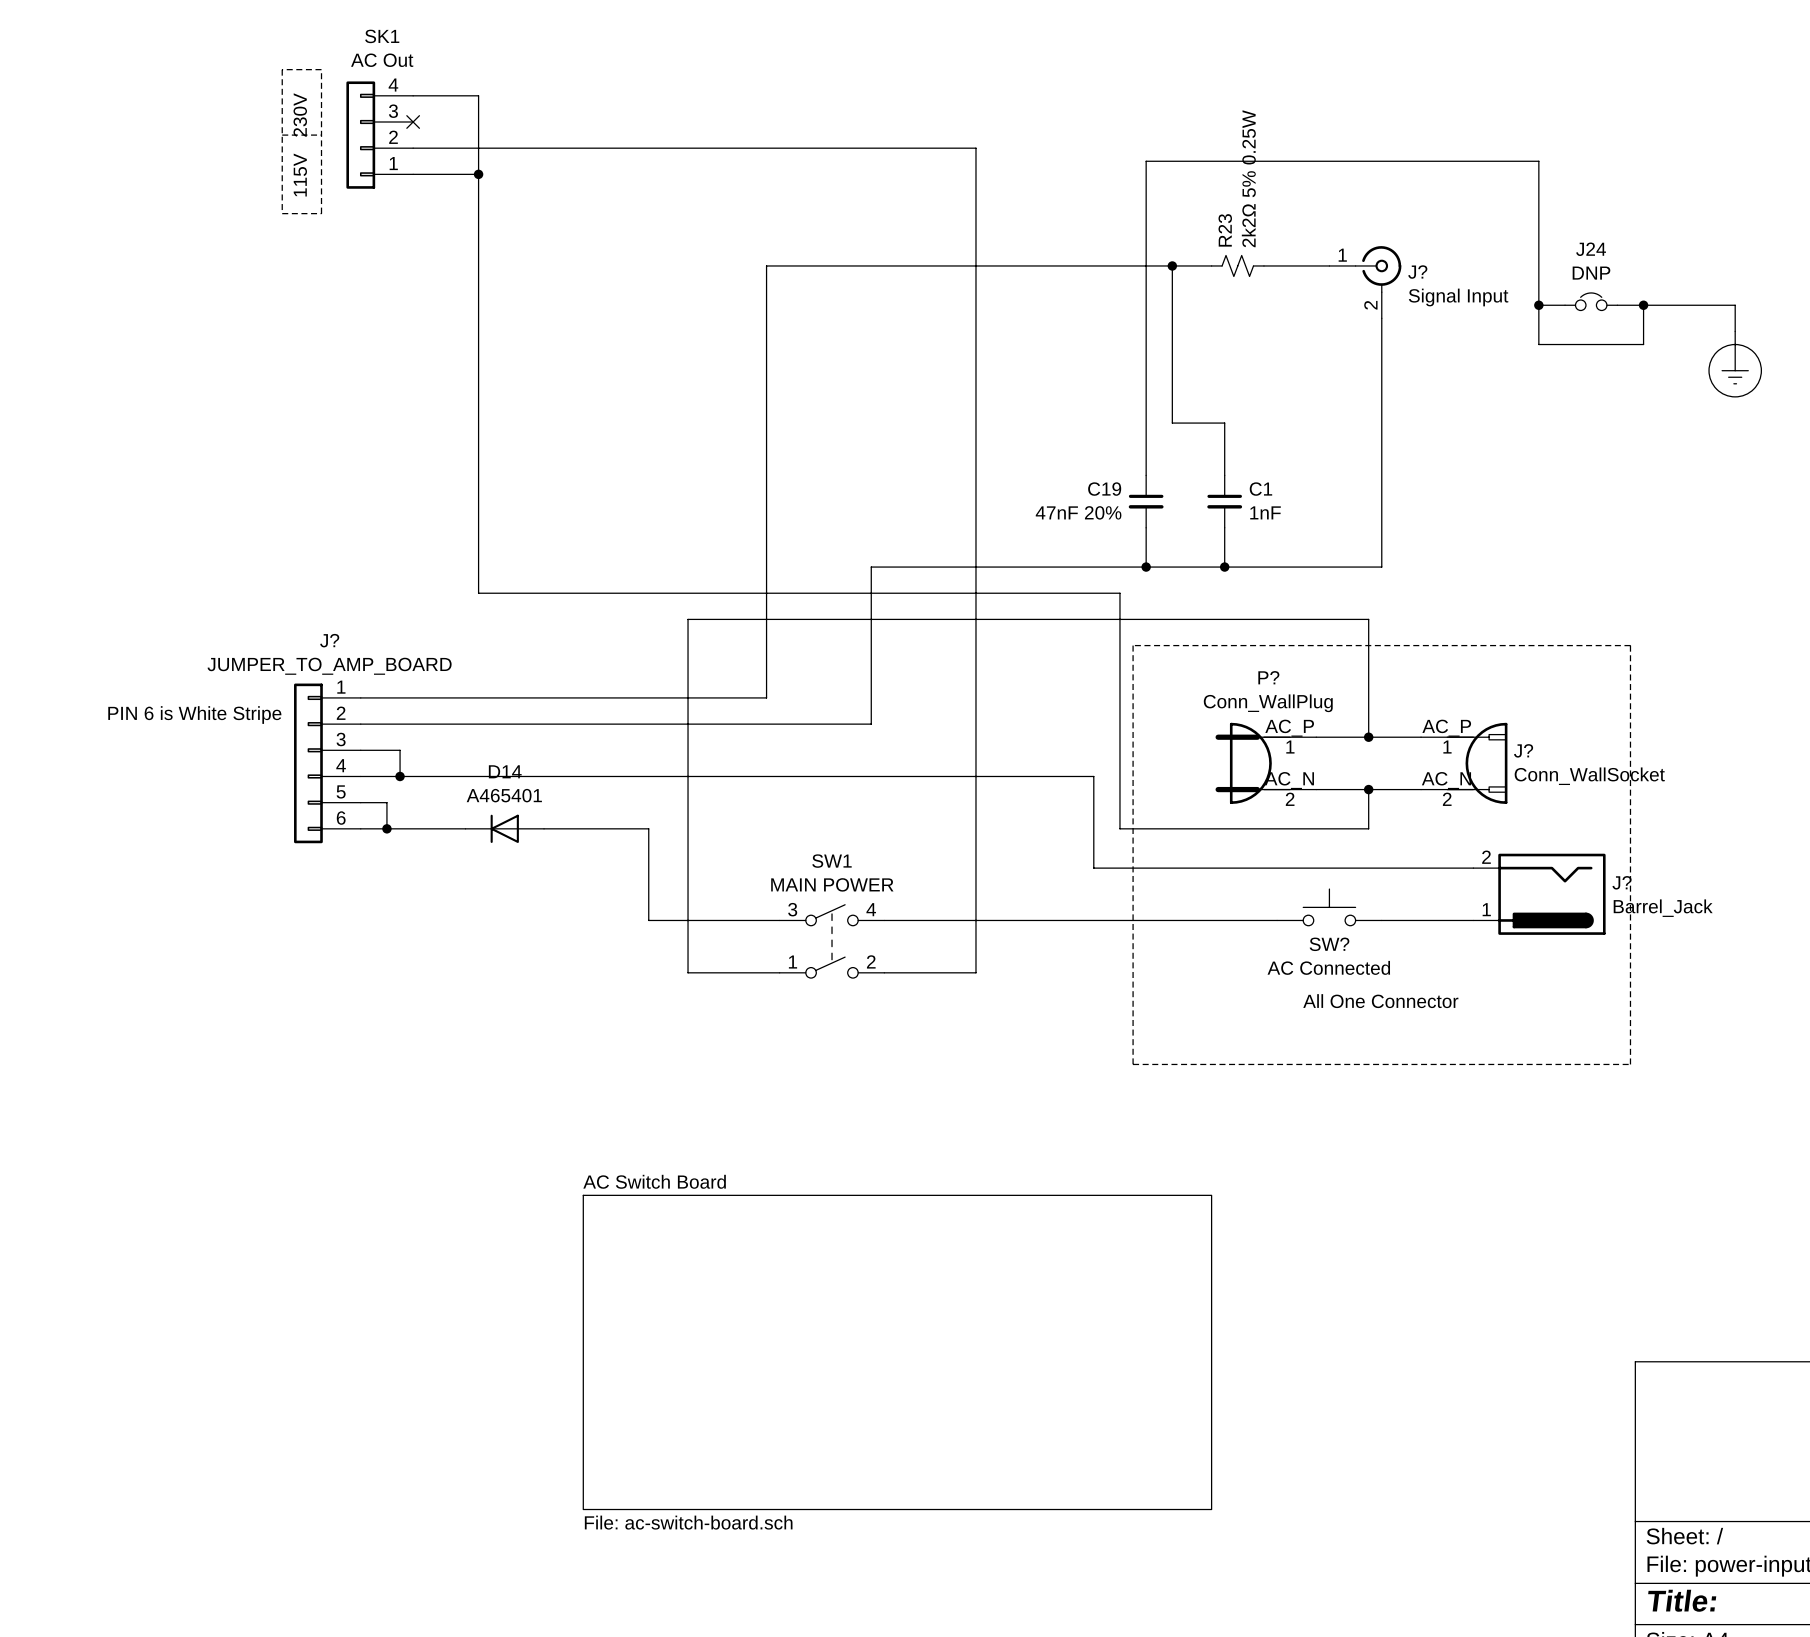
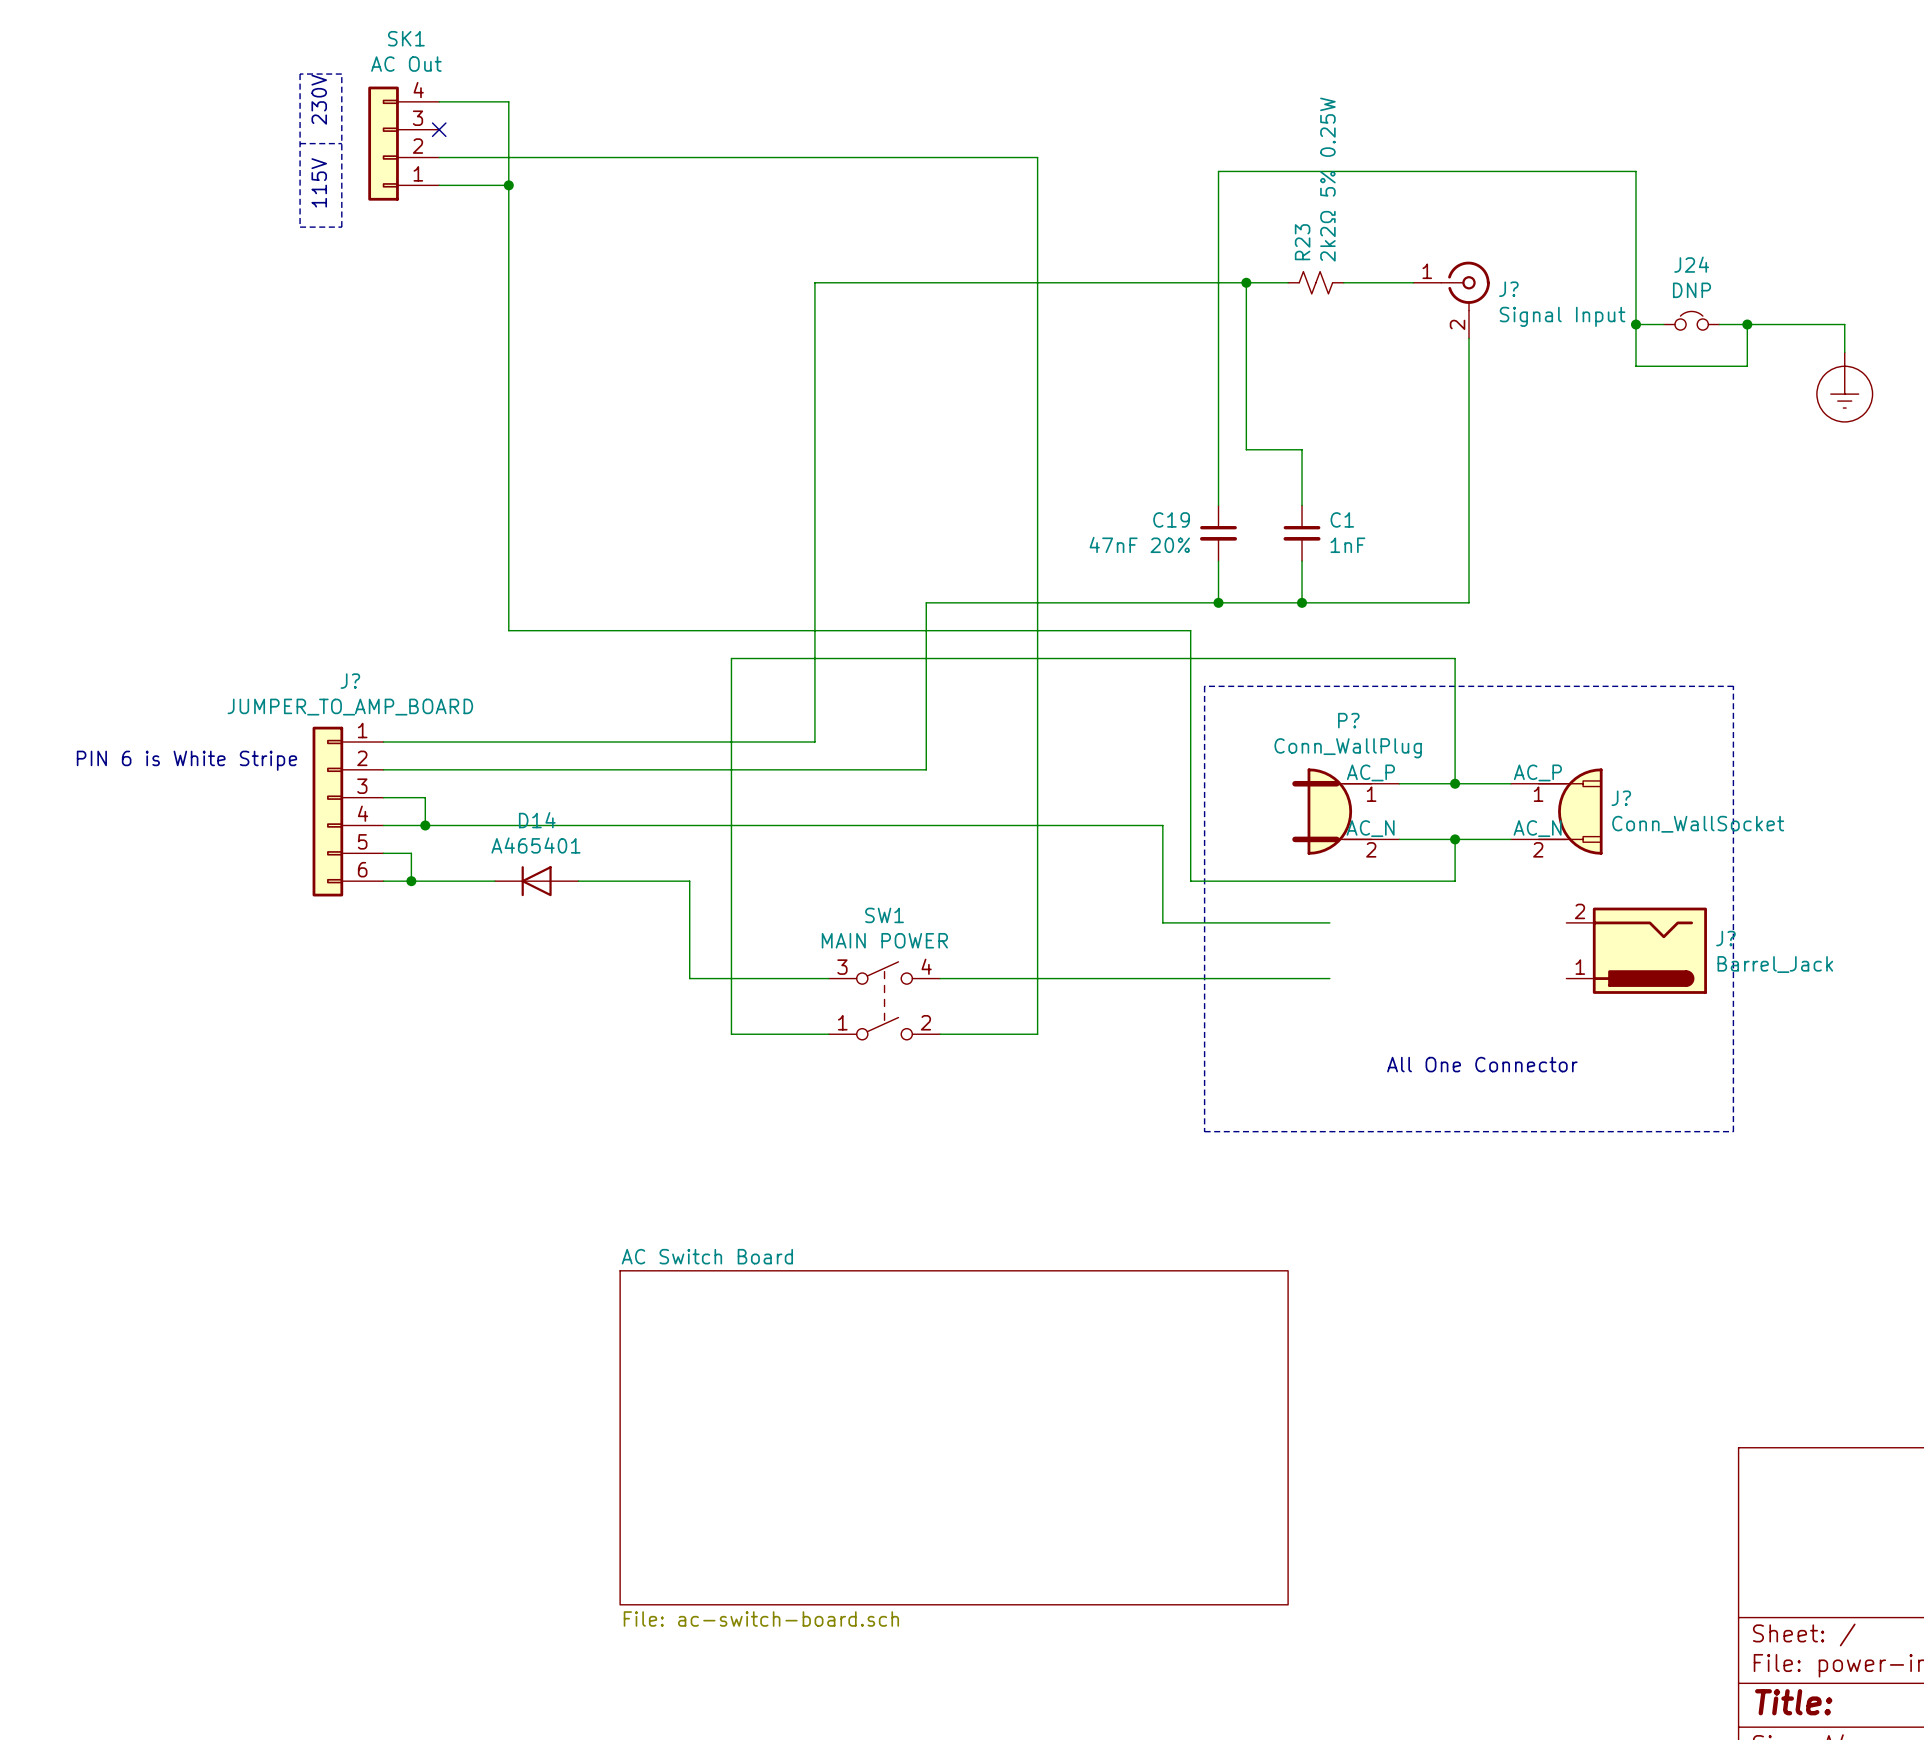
wire: (1250, 868) (1473, 868) -> none
SW?: AC Connected (1329, 907) -> none
wire: (1250, 920) (1277, 920) -> none
wire: (1381, 920) (1473, 920) -> none

